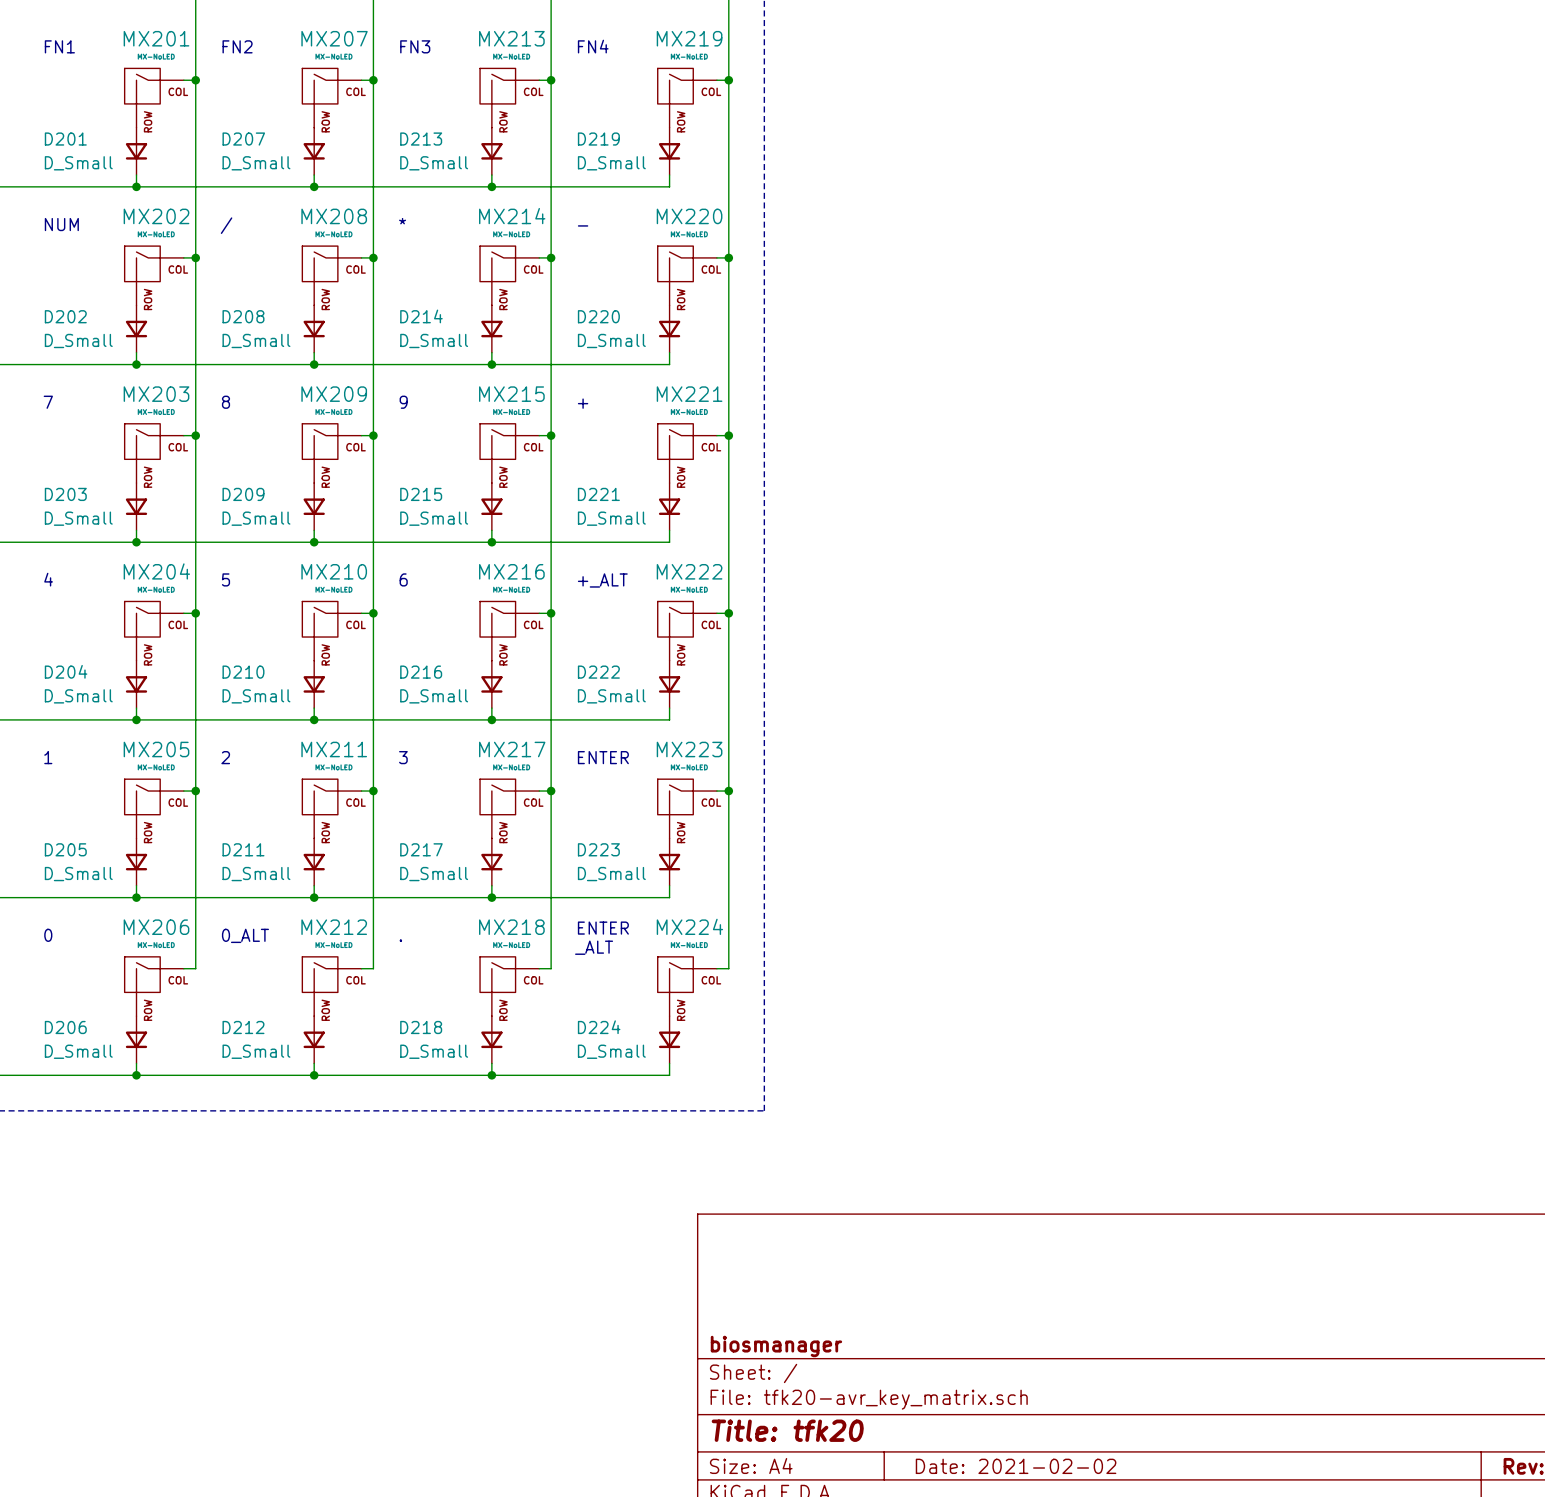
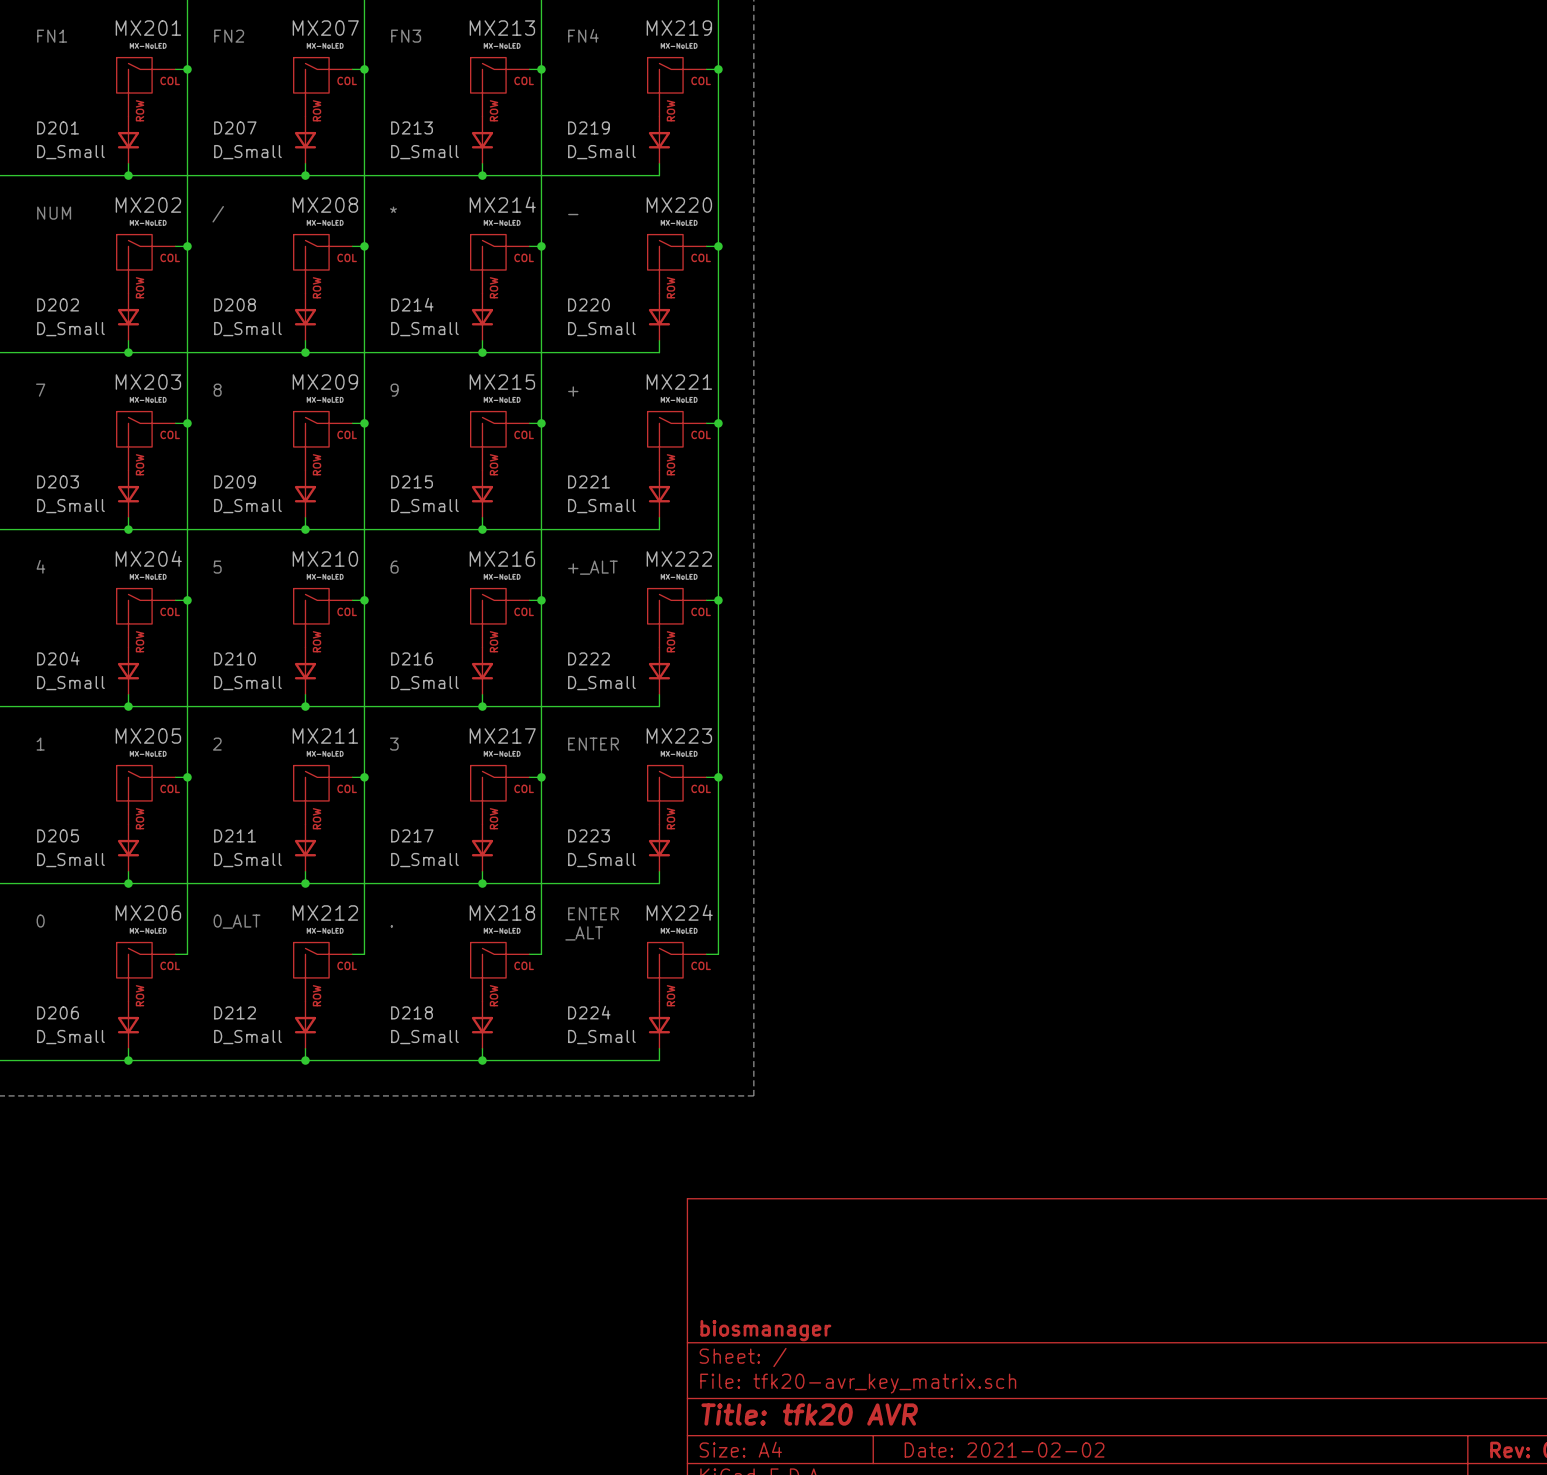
title block: Title: tfk20 (787, 1430) -> Title: tfk20 AVR (809, 1414)

